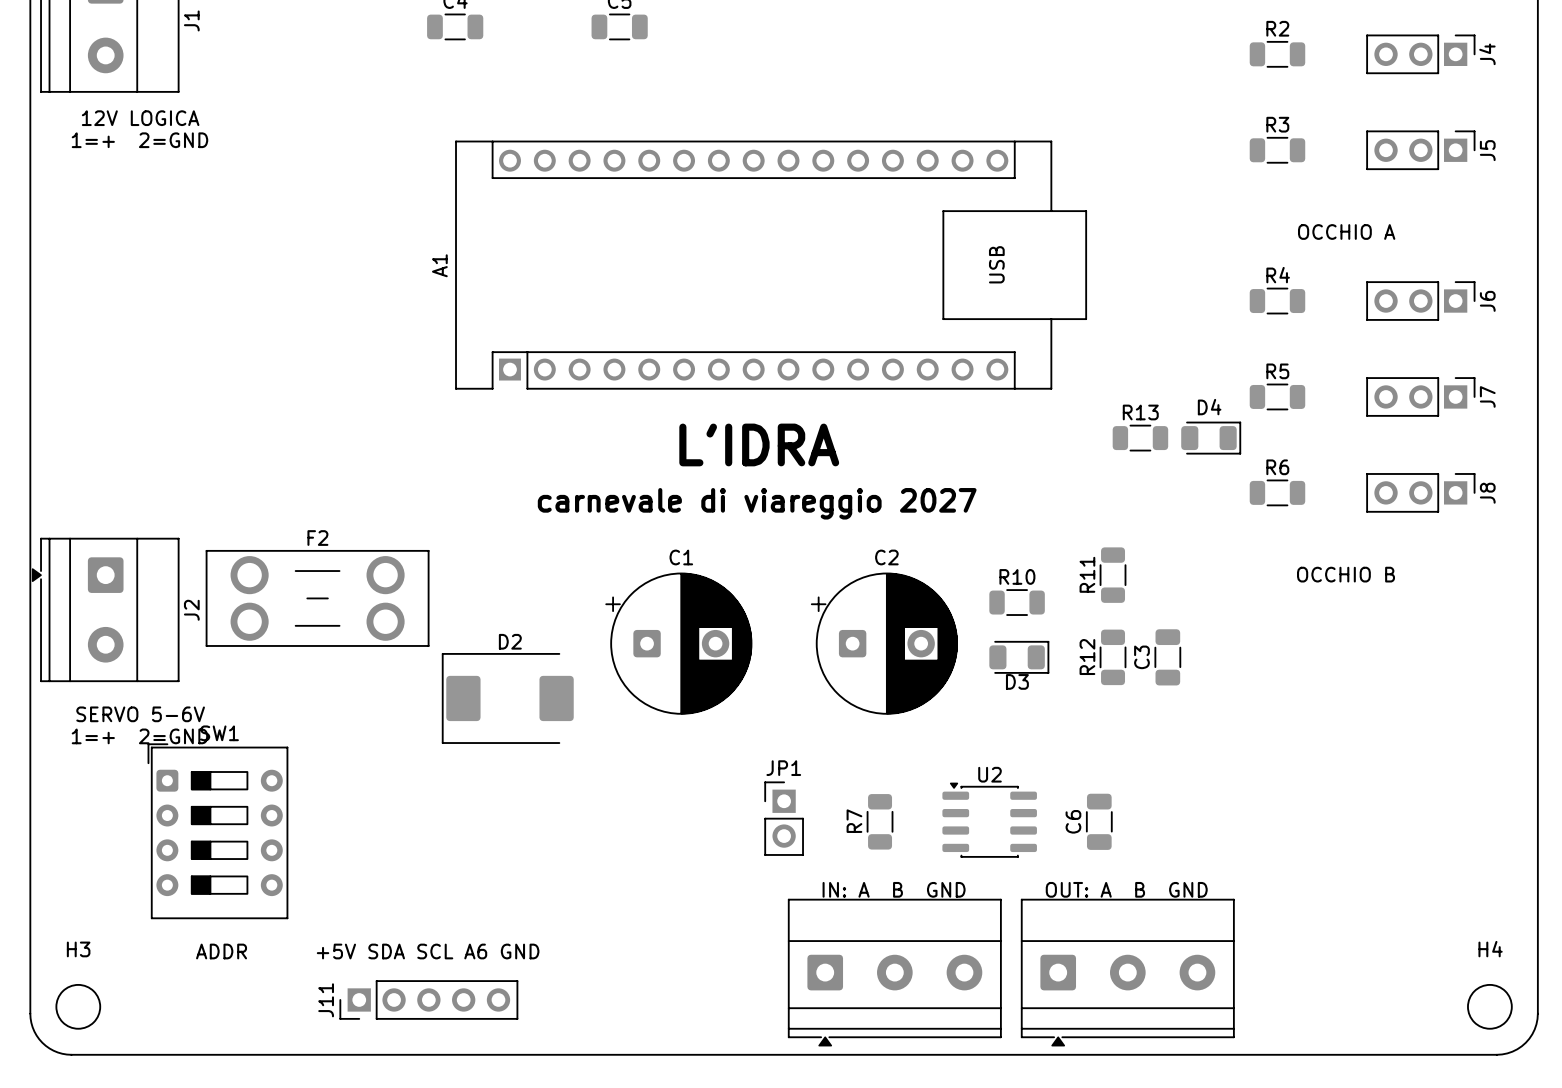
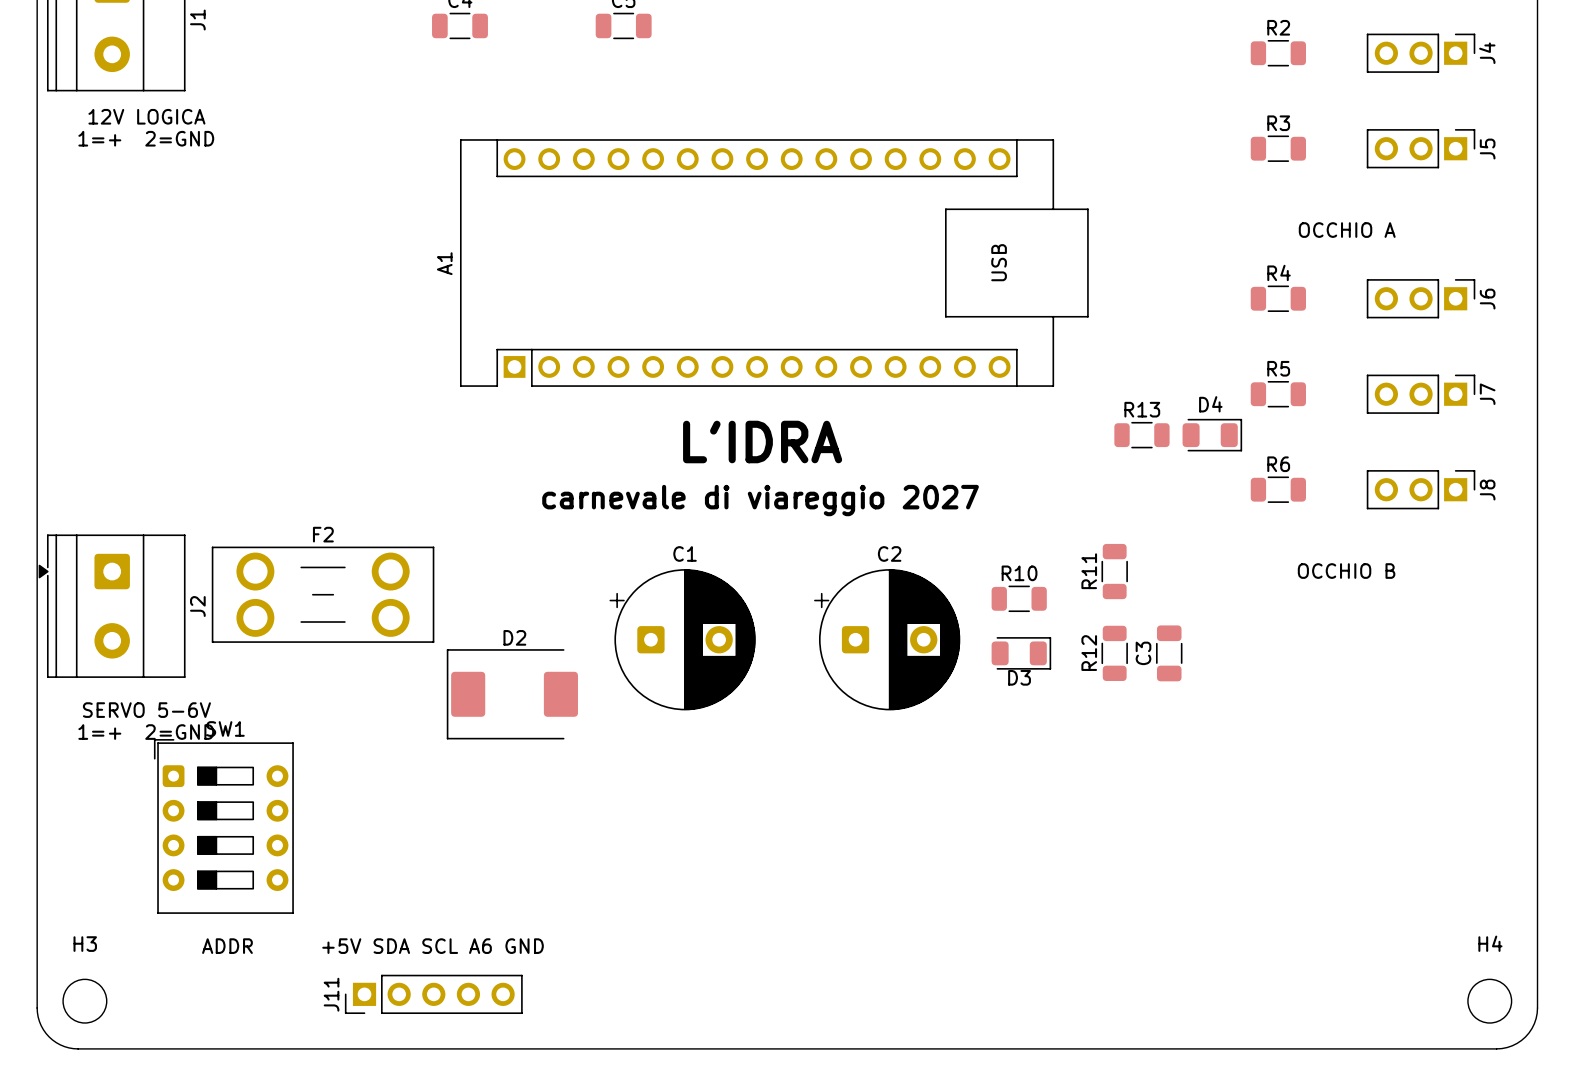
JP1: (784, 818) -> none
U2: (989, 820) -> none
R7: (880, 821) -> none
C6: (1099, 821) -> none
text: IN: A B GND (894, 889) -> none
text: OUT: A B GND (1126, 889) -> none
part: (894, 972) -> none
part: (1127, 972) -> none

